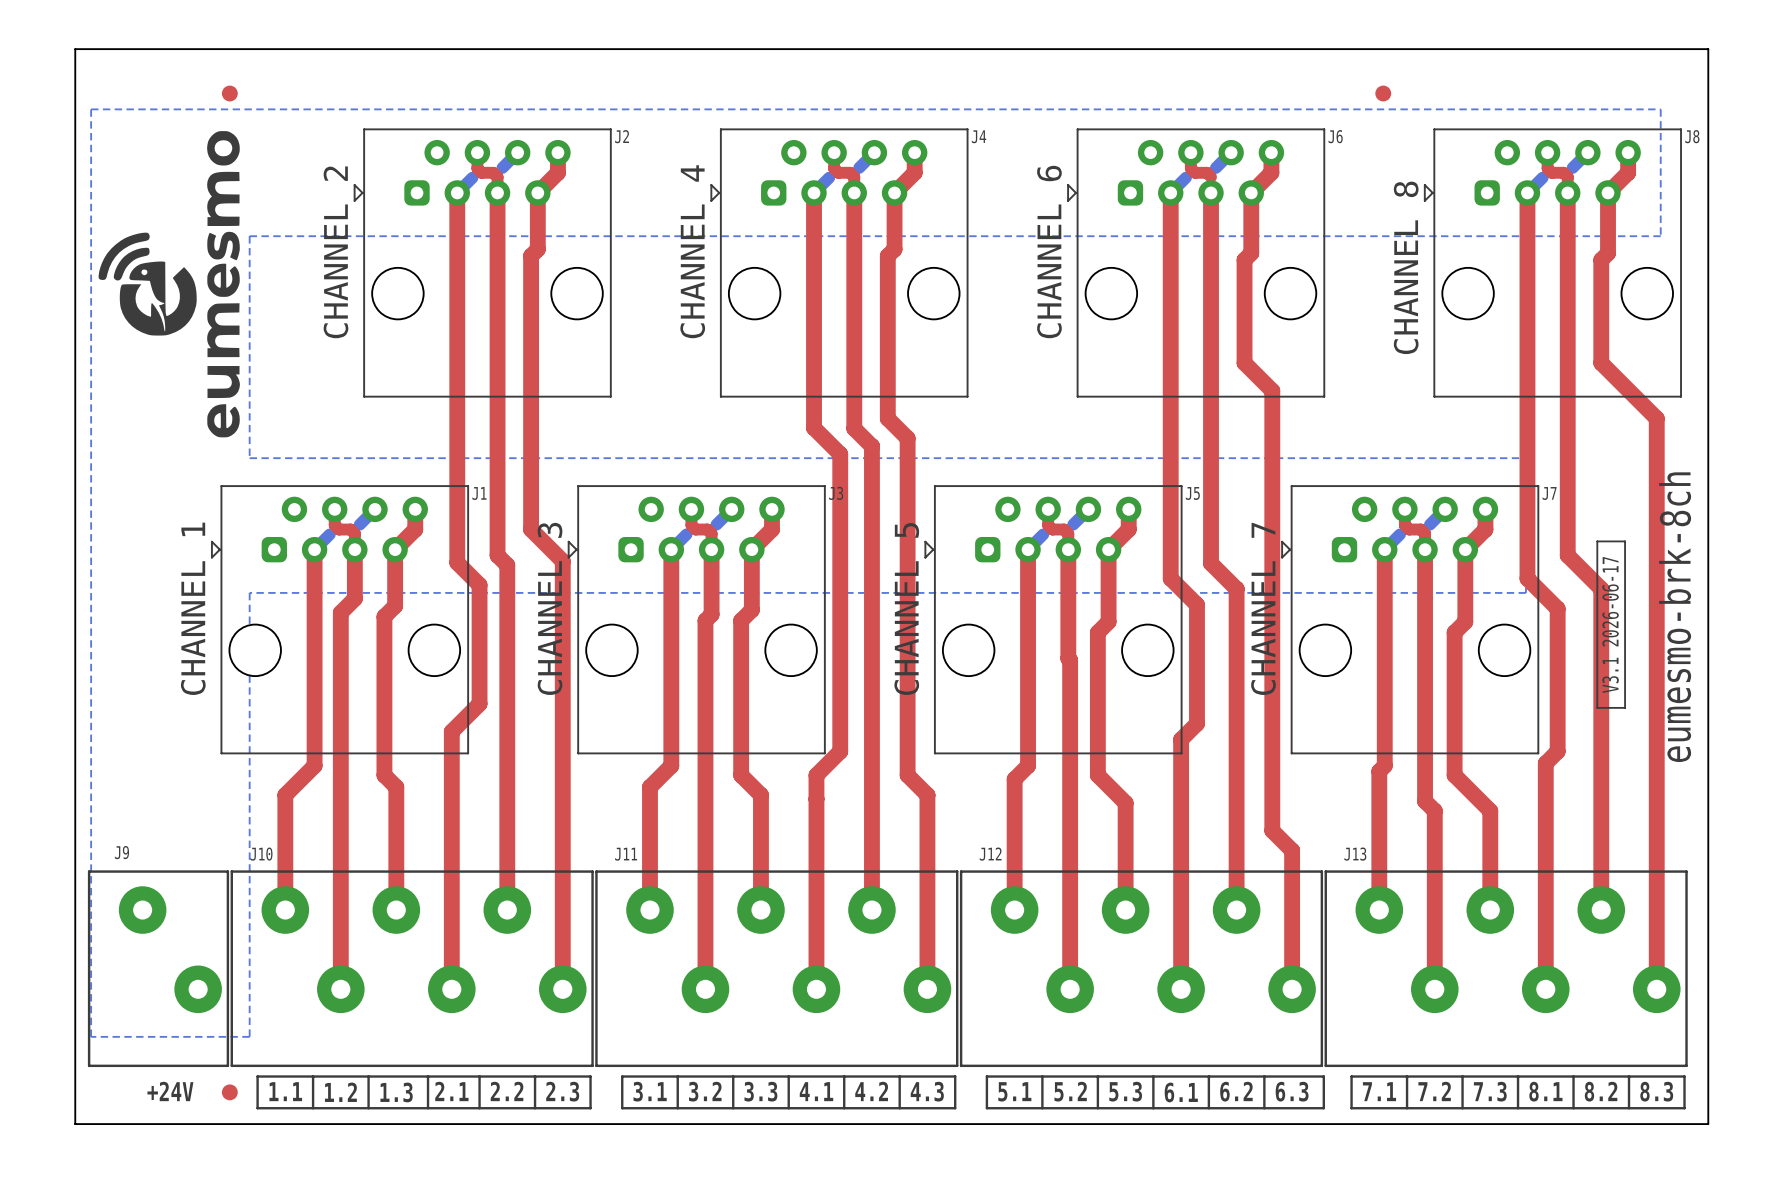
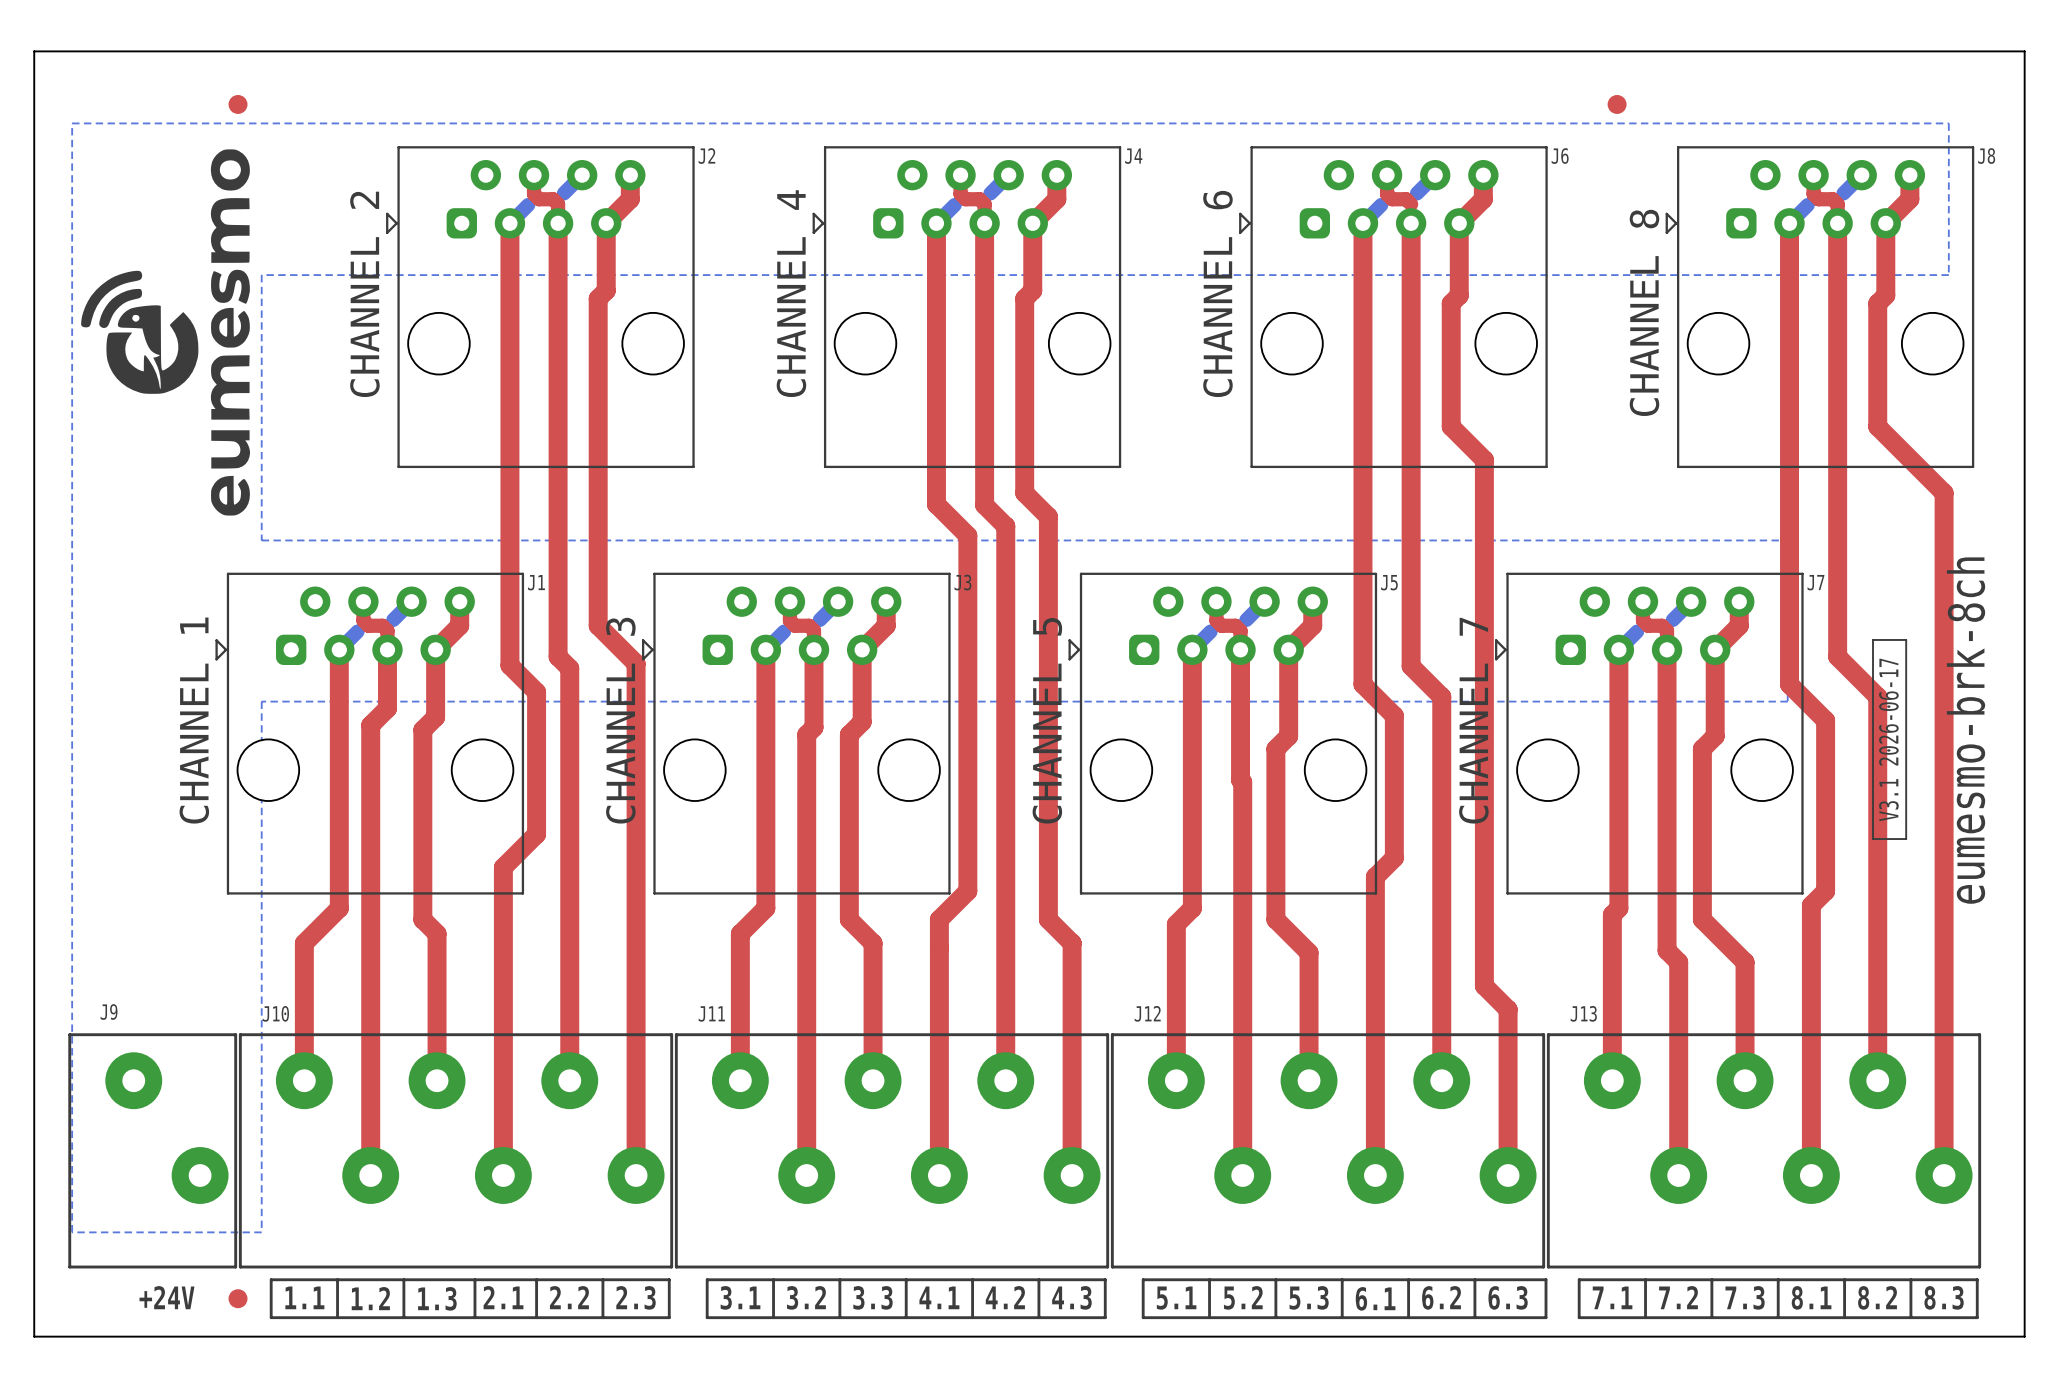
board edge: (75, 49) (75, 1124) -> (53, 51) (34, 51) (34, 1336) (53, 1336)
board edge: (1708, 49) (1708, 1124) -> (2005, 51) (2024, 51) (2024, 1336) (2005, 1336)

